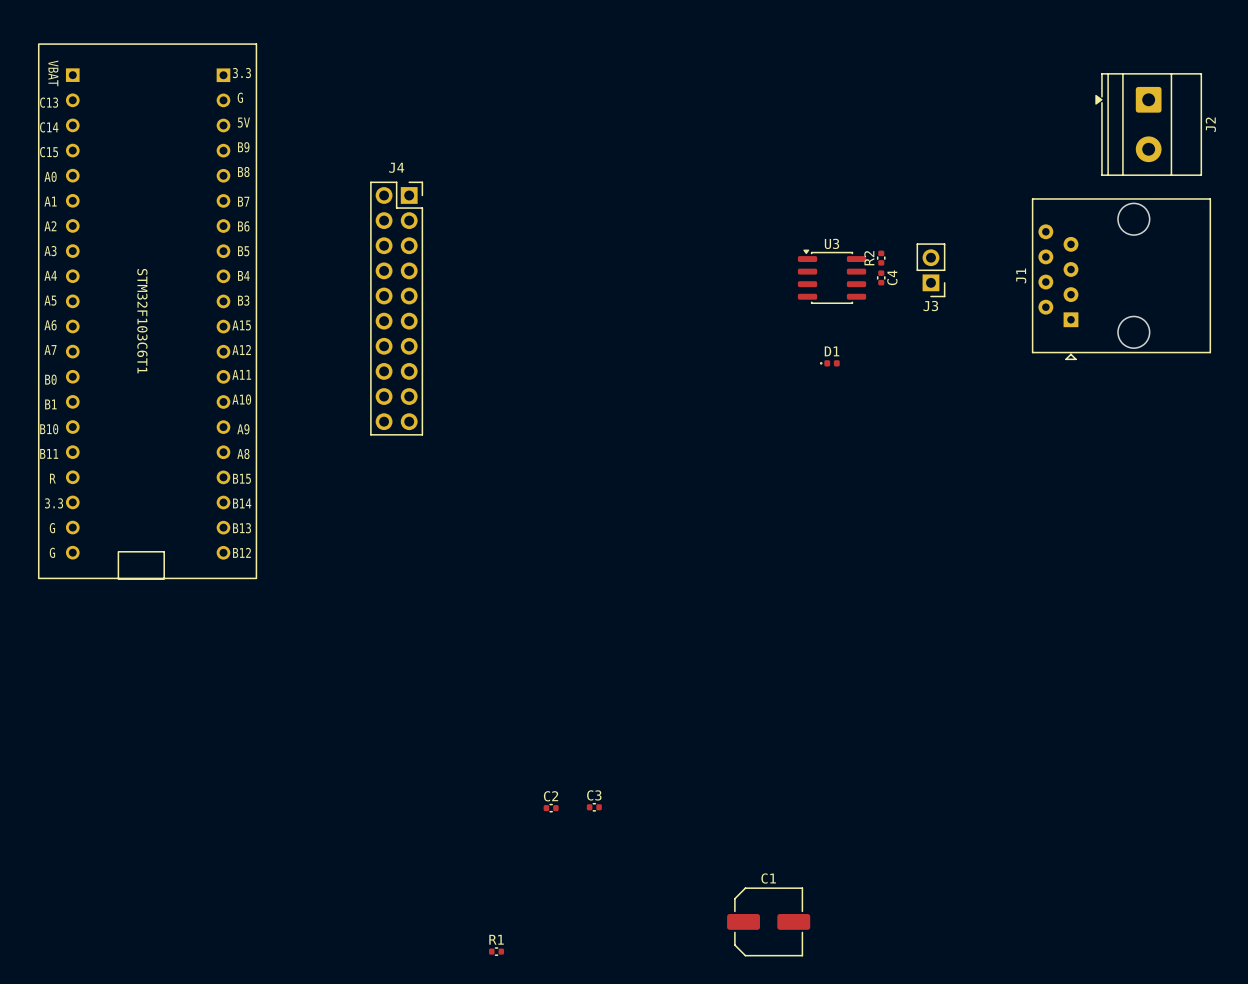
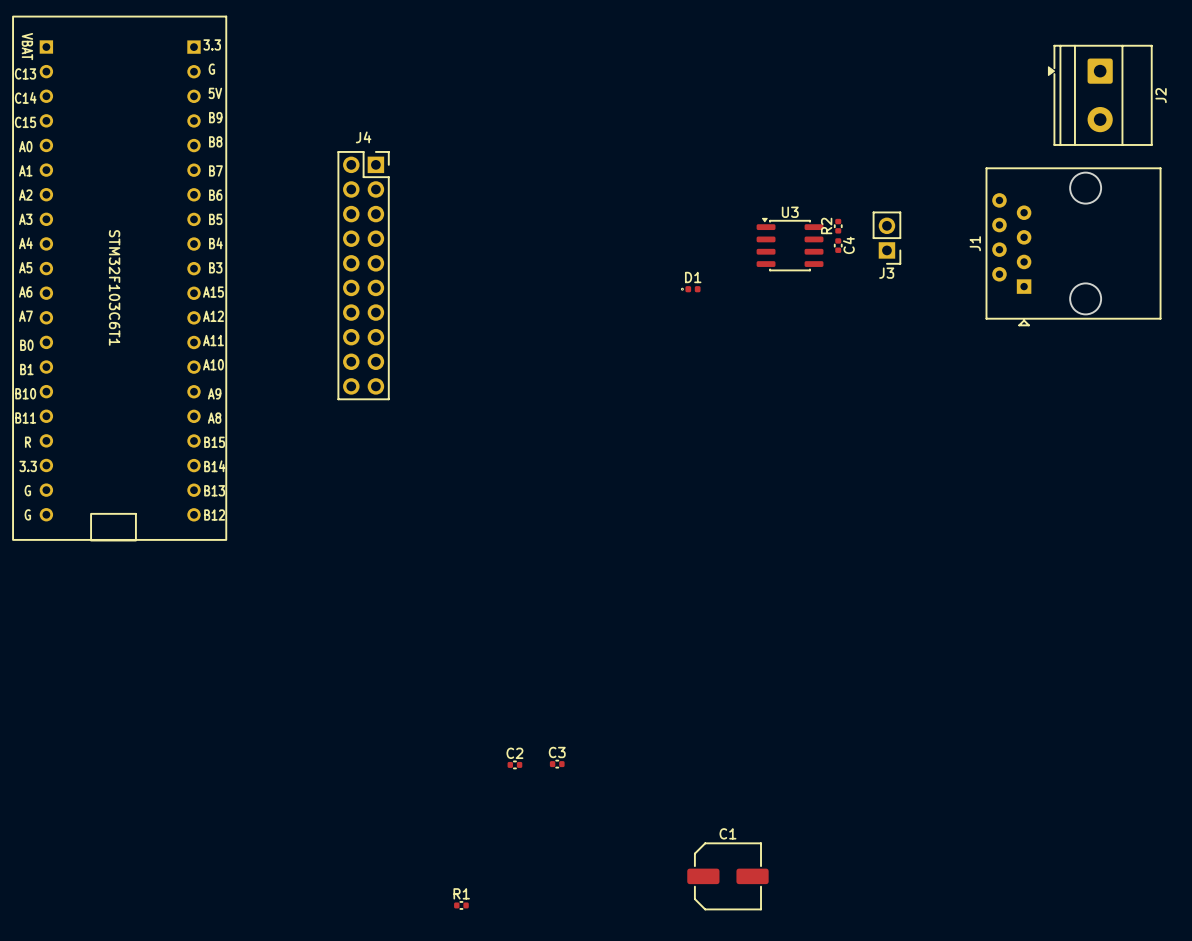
D1 position: (830, 363) -> (690, 289)

